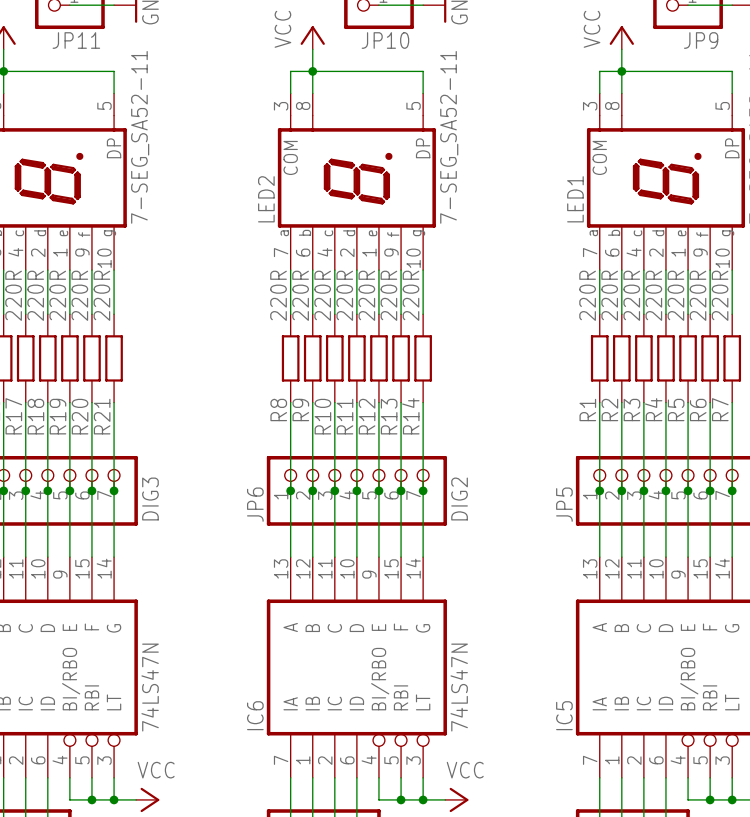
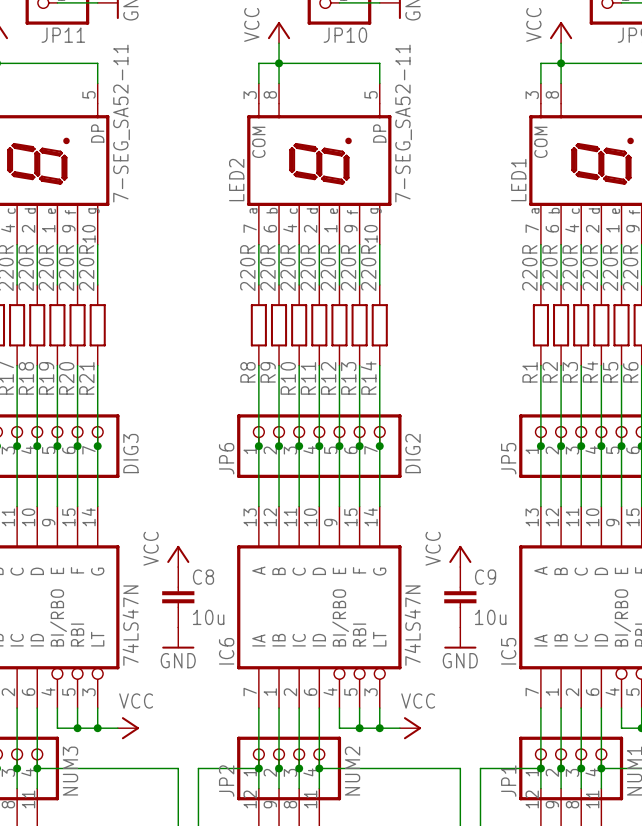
power symbol: none -> VCC (178, 556)
power symbol: none -> VCC (460, 556)
C8: none -> 10u (178, 597)
C9: none -> 10u (460, 597)
power symbol: none -> GND (178, 638)
power symbol: none -> GND (460, 638)

